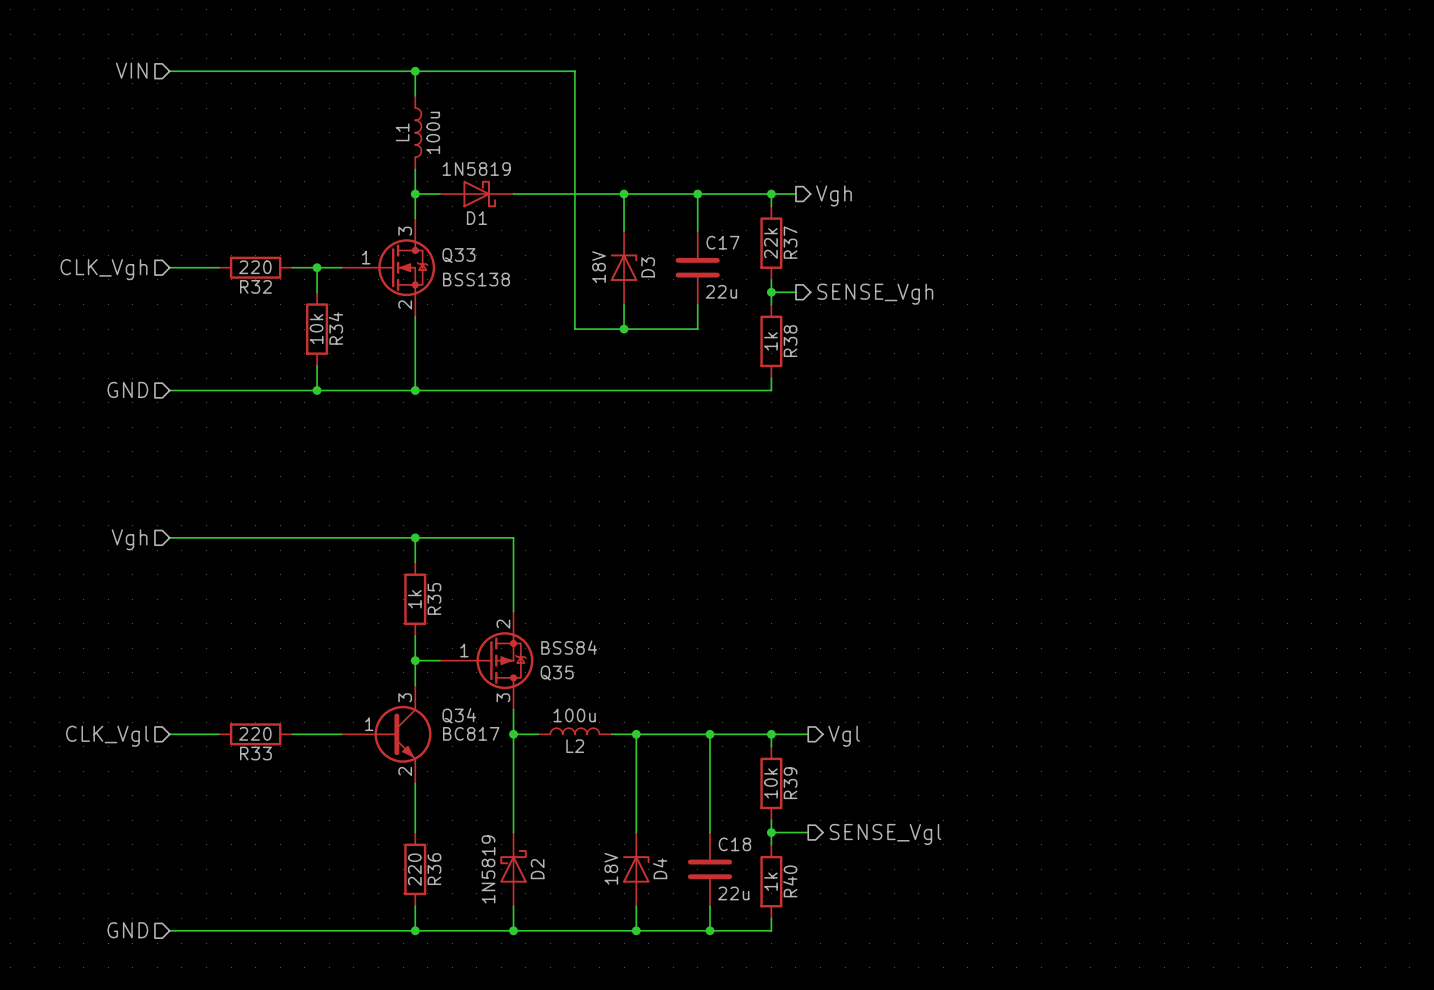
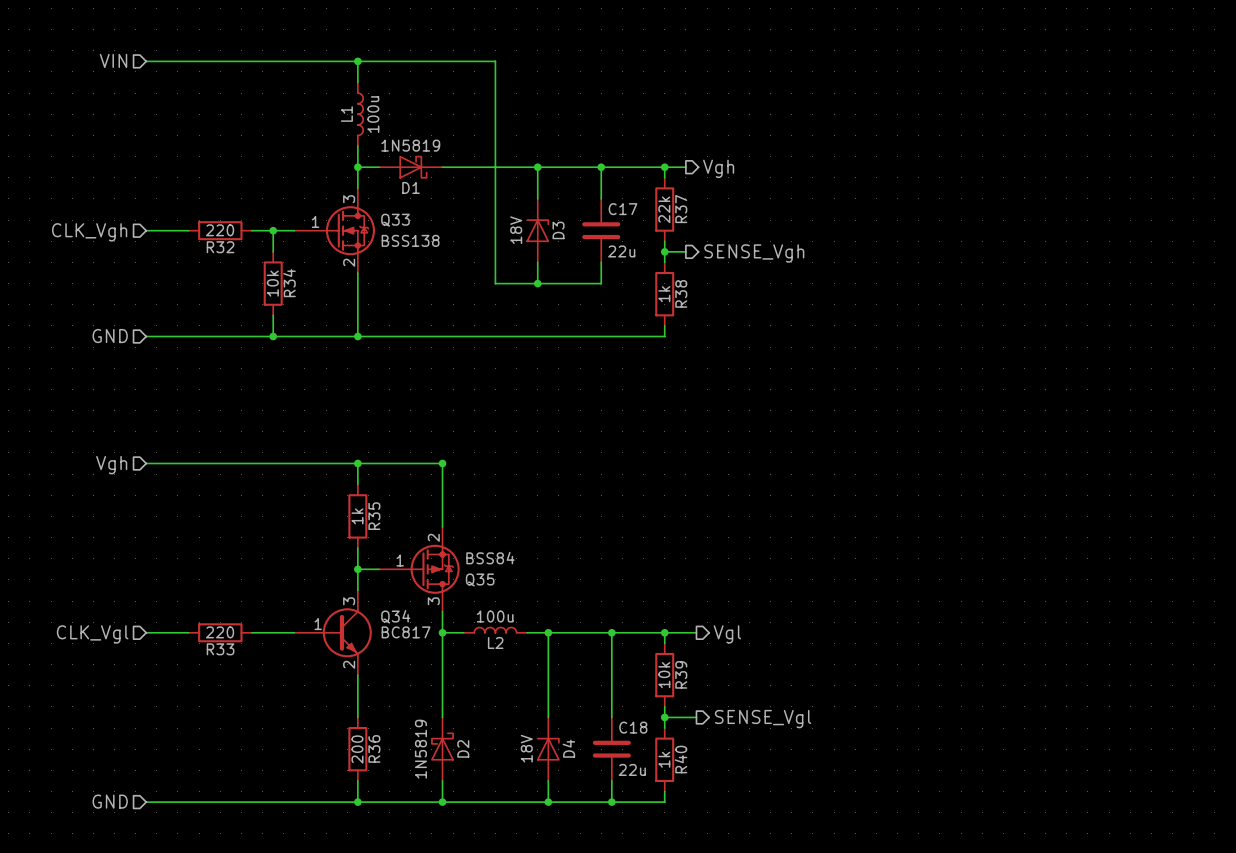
junction: none -> (442, 463)
R36 value: 220 (414, 869) -> 200 (357, 749)

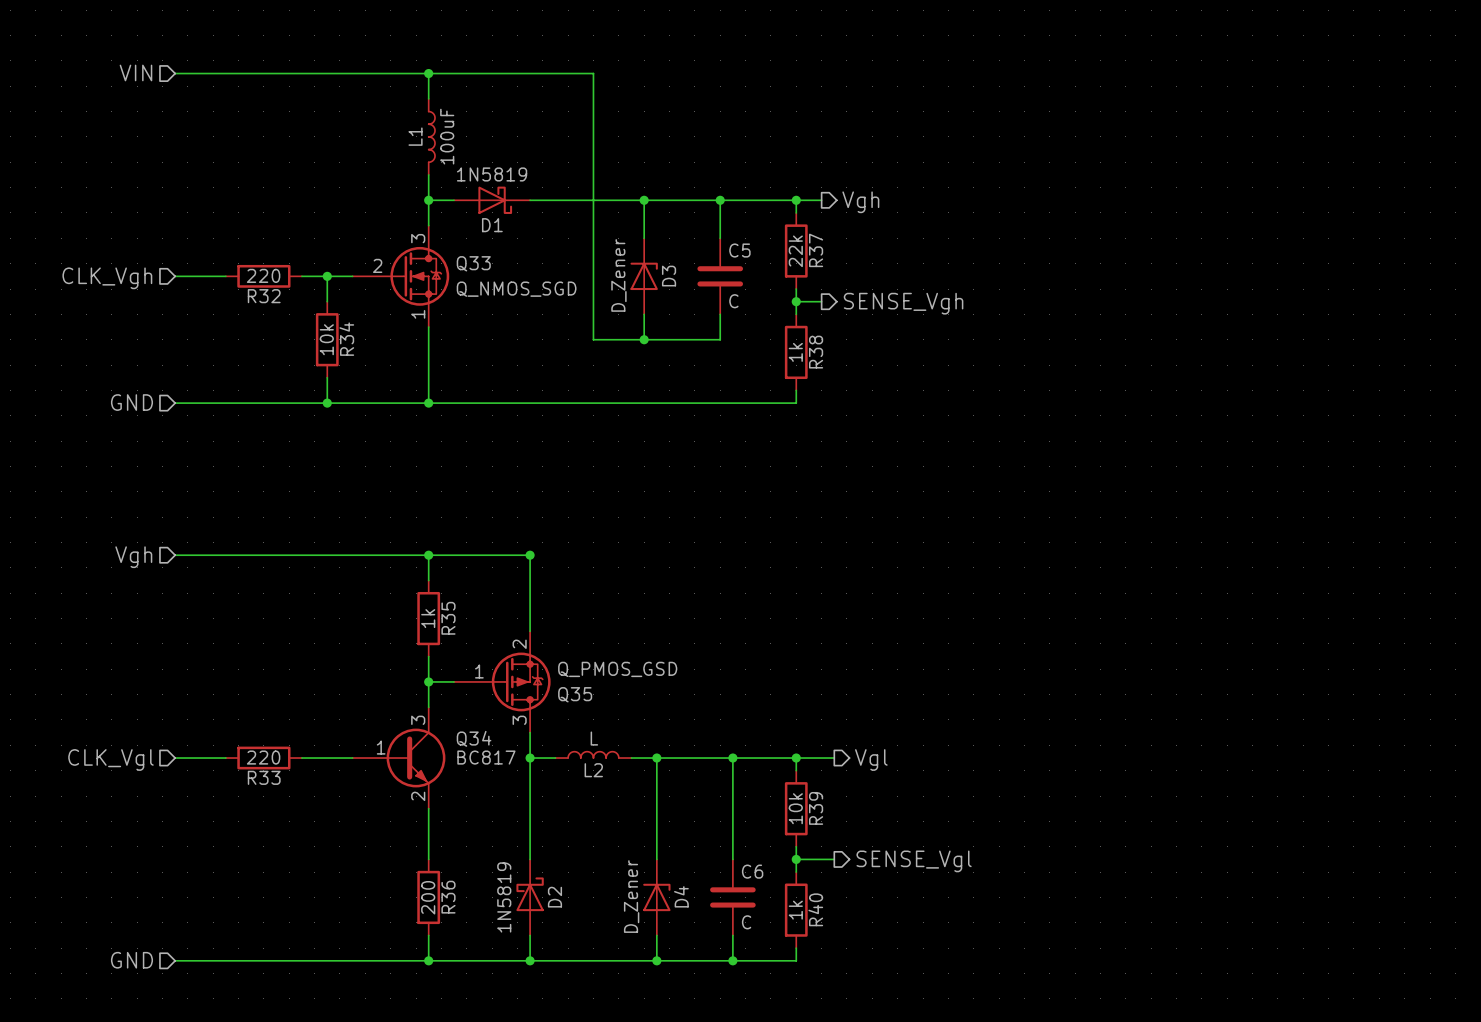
L1 value: 100u (373, 114) -> 100uF (447, 136)
C17 name: C17 (622, 209) -> C5 (739, 250)
Q33 pin number: 1 (315, 221) -> 2 (377, 265)
D3 value: 18V (516, 230) -> D_Zener (618, 275)
Q33 value: BSS138 (410, 240) -> Q_NMOS_SGD (516, 289)
C17 value: 22u (621, 251) -> C (733, 301)
Q33 pin number: 2 (349, 262) -> 1 (418, 314)
Q35 value: BSS84 (490, 558) -> Q_PMOS_GSD (617, 669)
L2 value: 100u (495, 616) -> L (594, 738)
C18 name: C18 (633, 727) -> C6 (752, 871)
D4 value: 18V (526, 748) -> D_Zener (631, 896)
C18 value: 22u (632, 769) -> C (746, 922)

